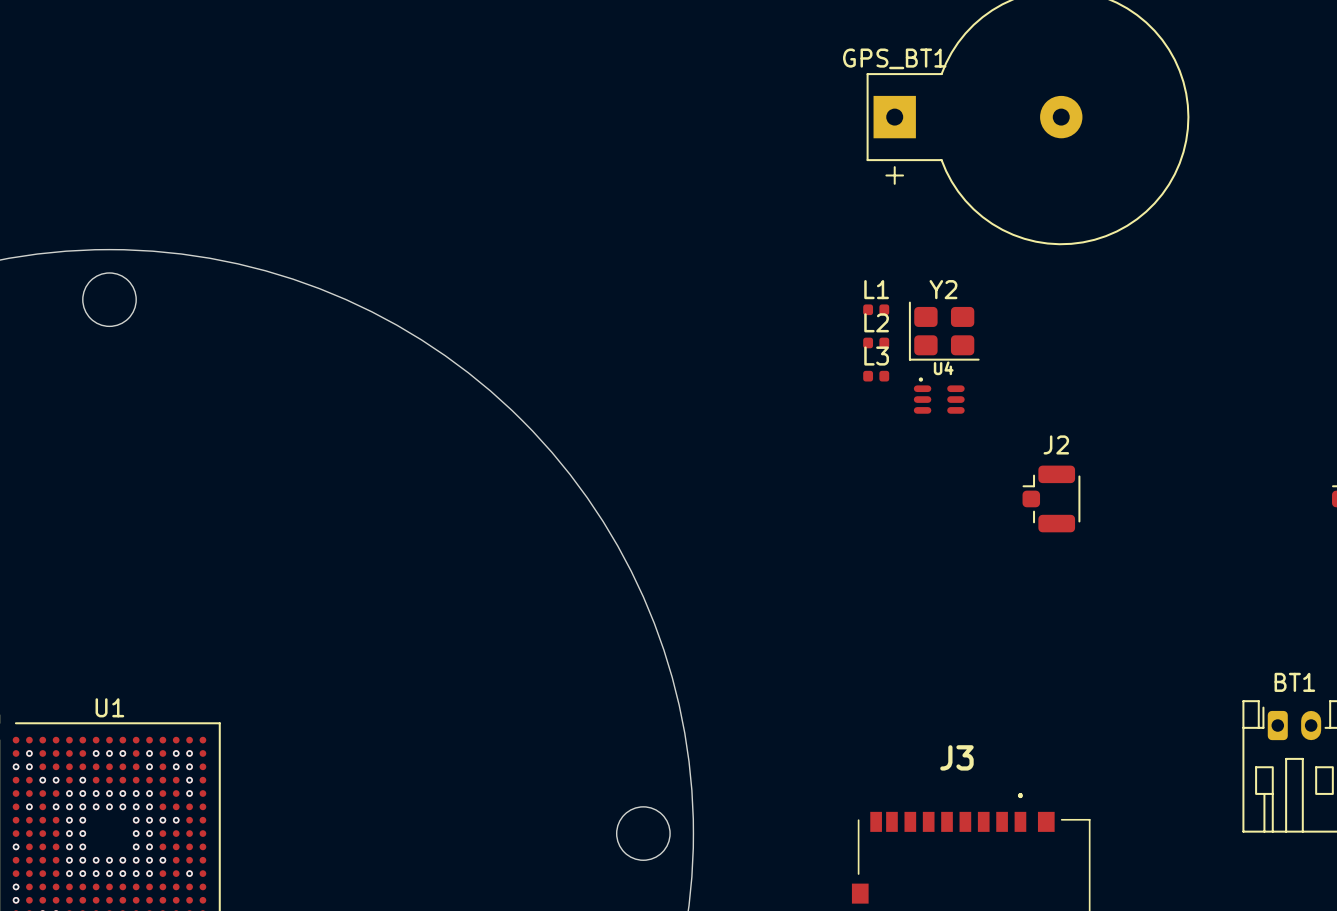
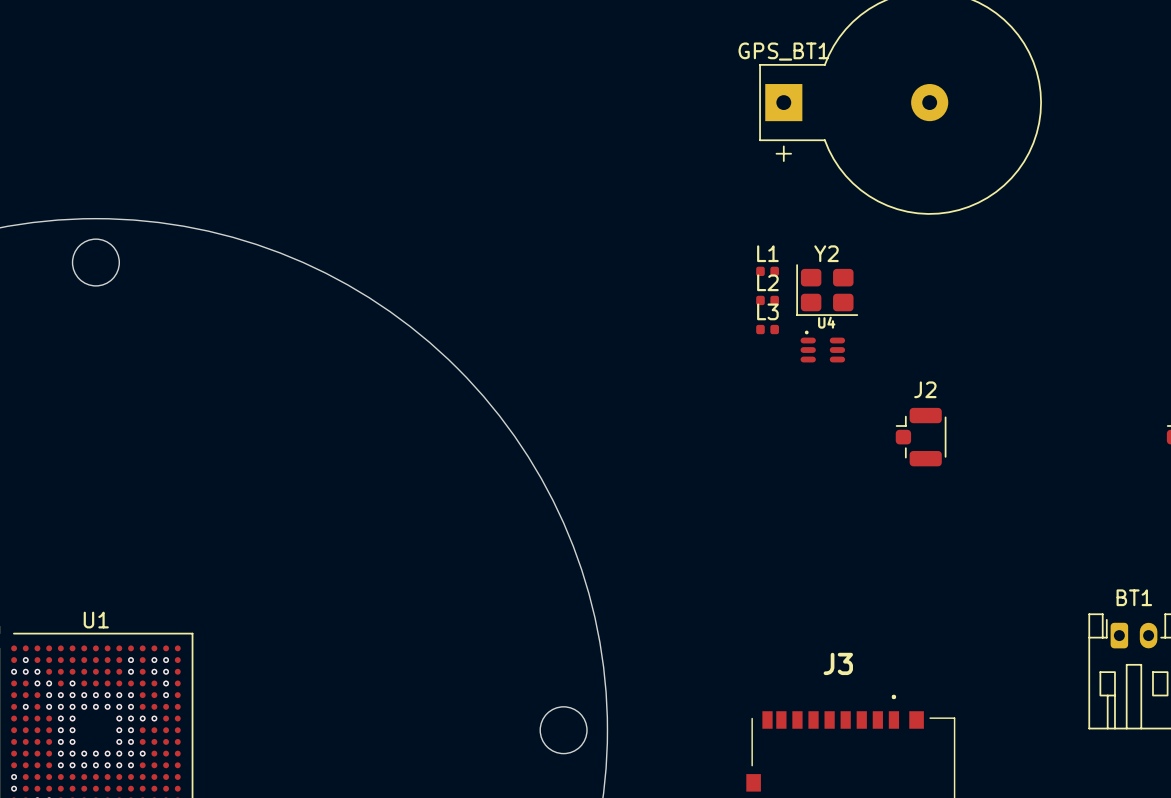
via: (96, 753) -> none
via: (109, 753) -> none
via: (122, 753) -> none
via: none -> (37, 671)
via: none -> (49, 695)
via: (16, 846) -> none
via: (189, 873) -> none

